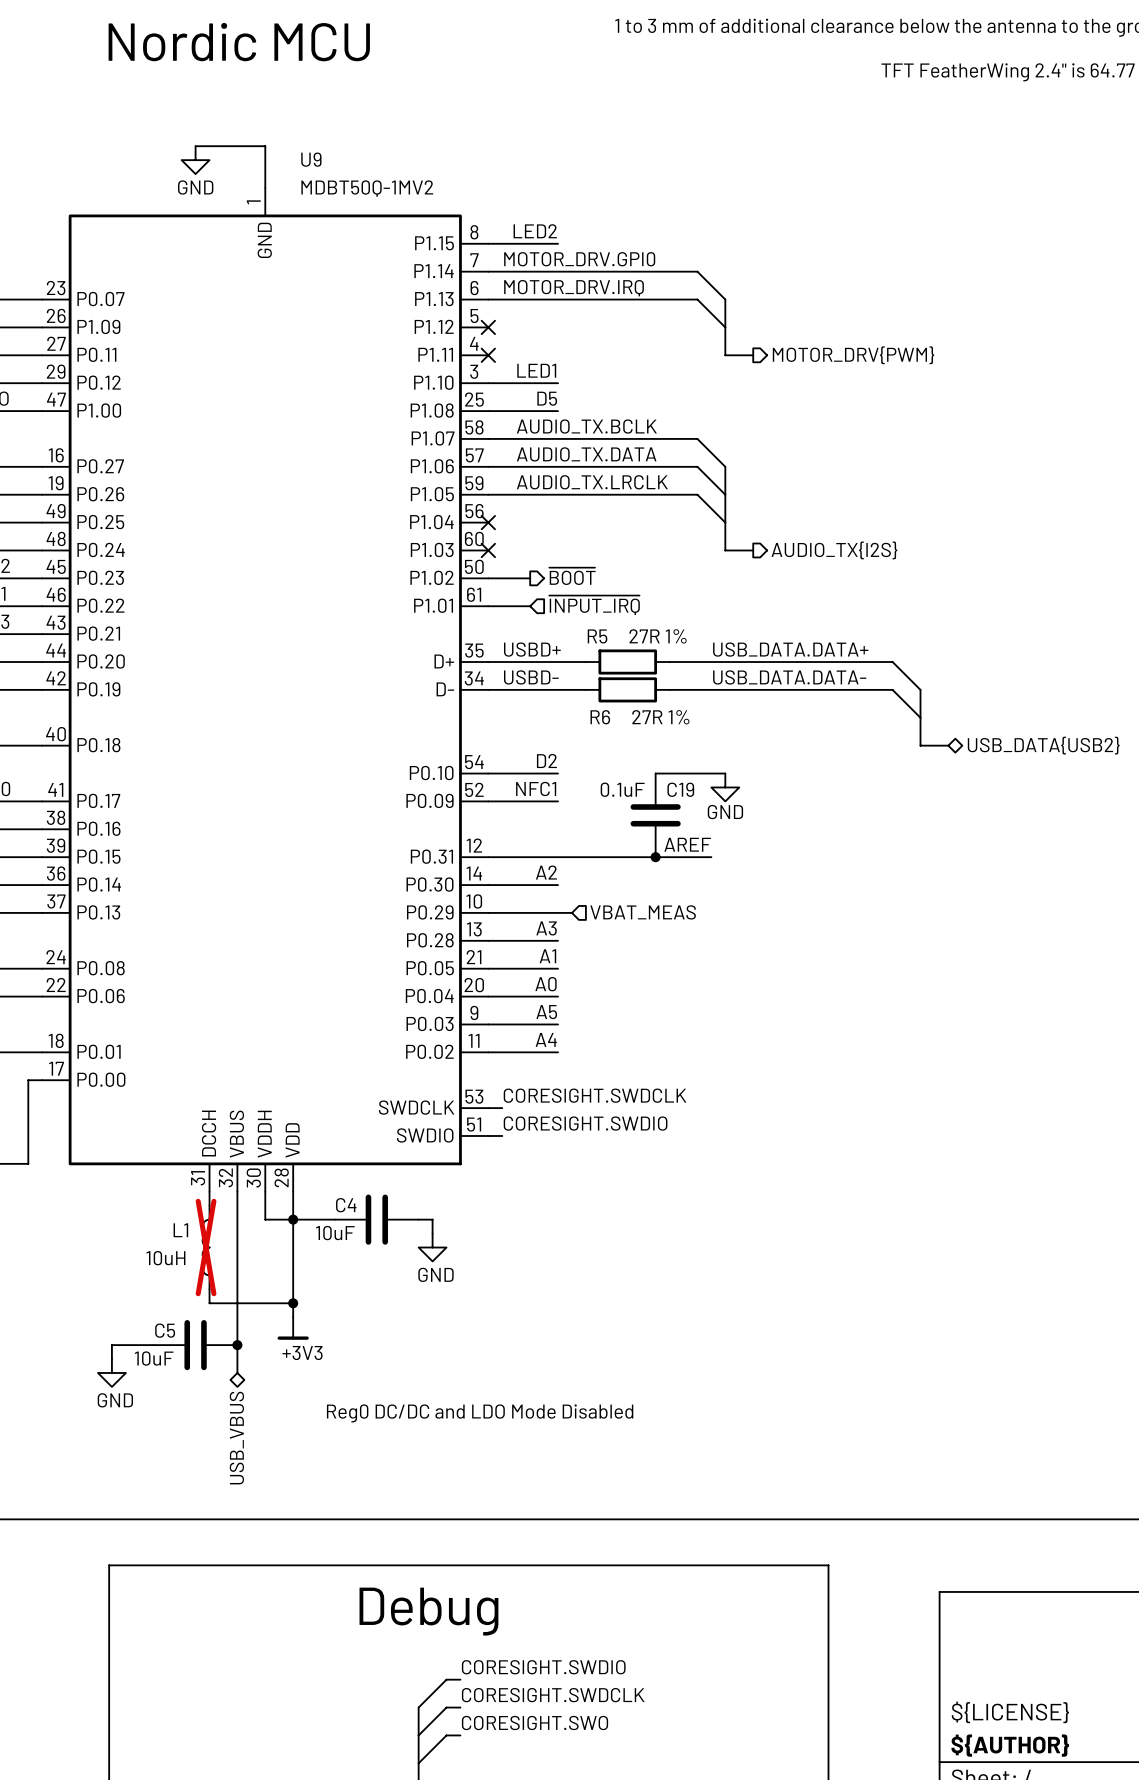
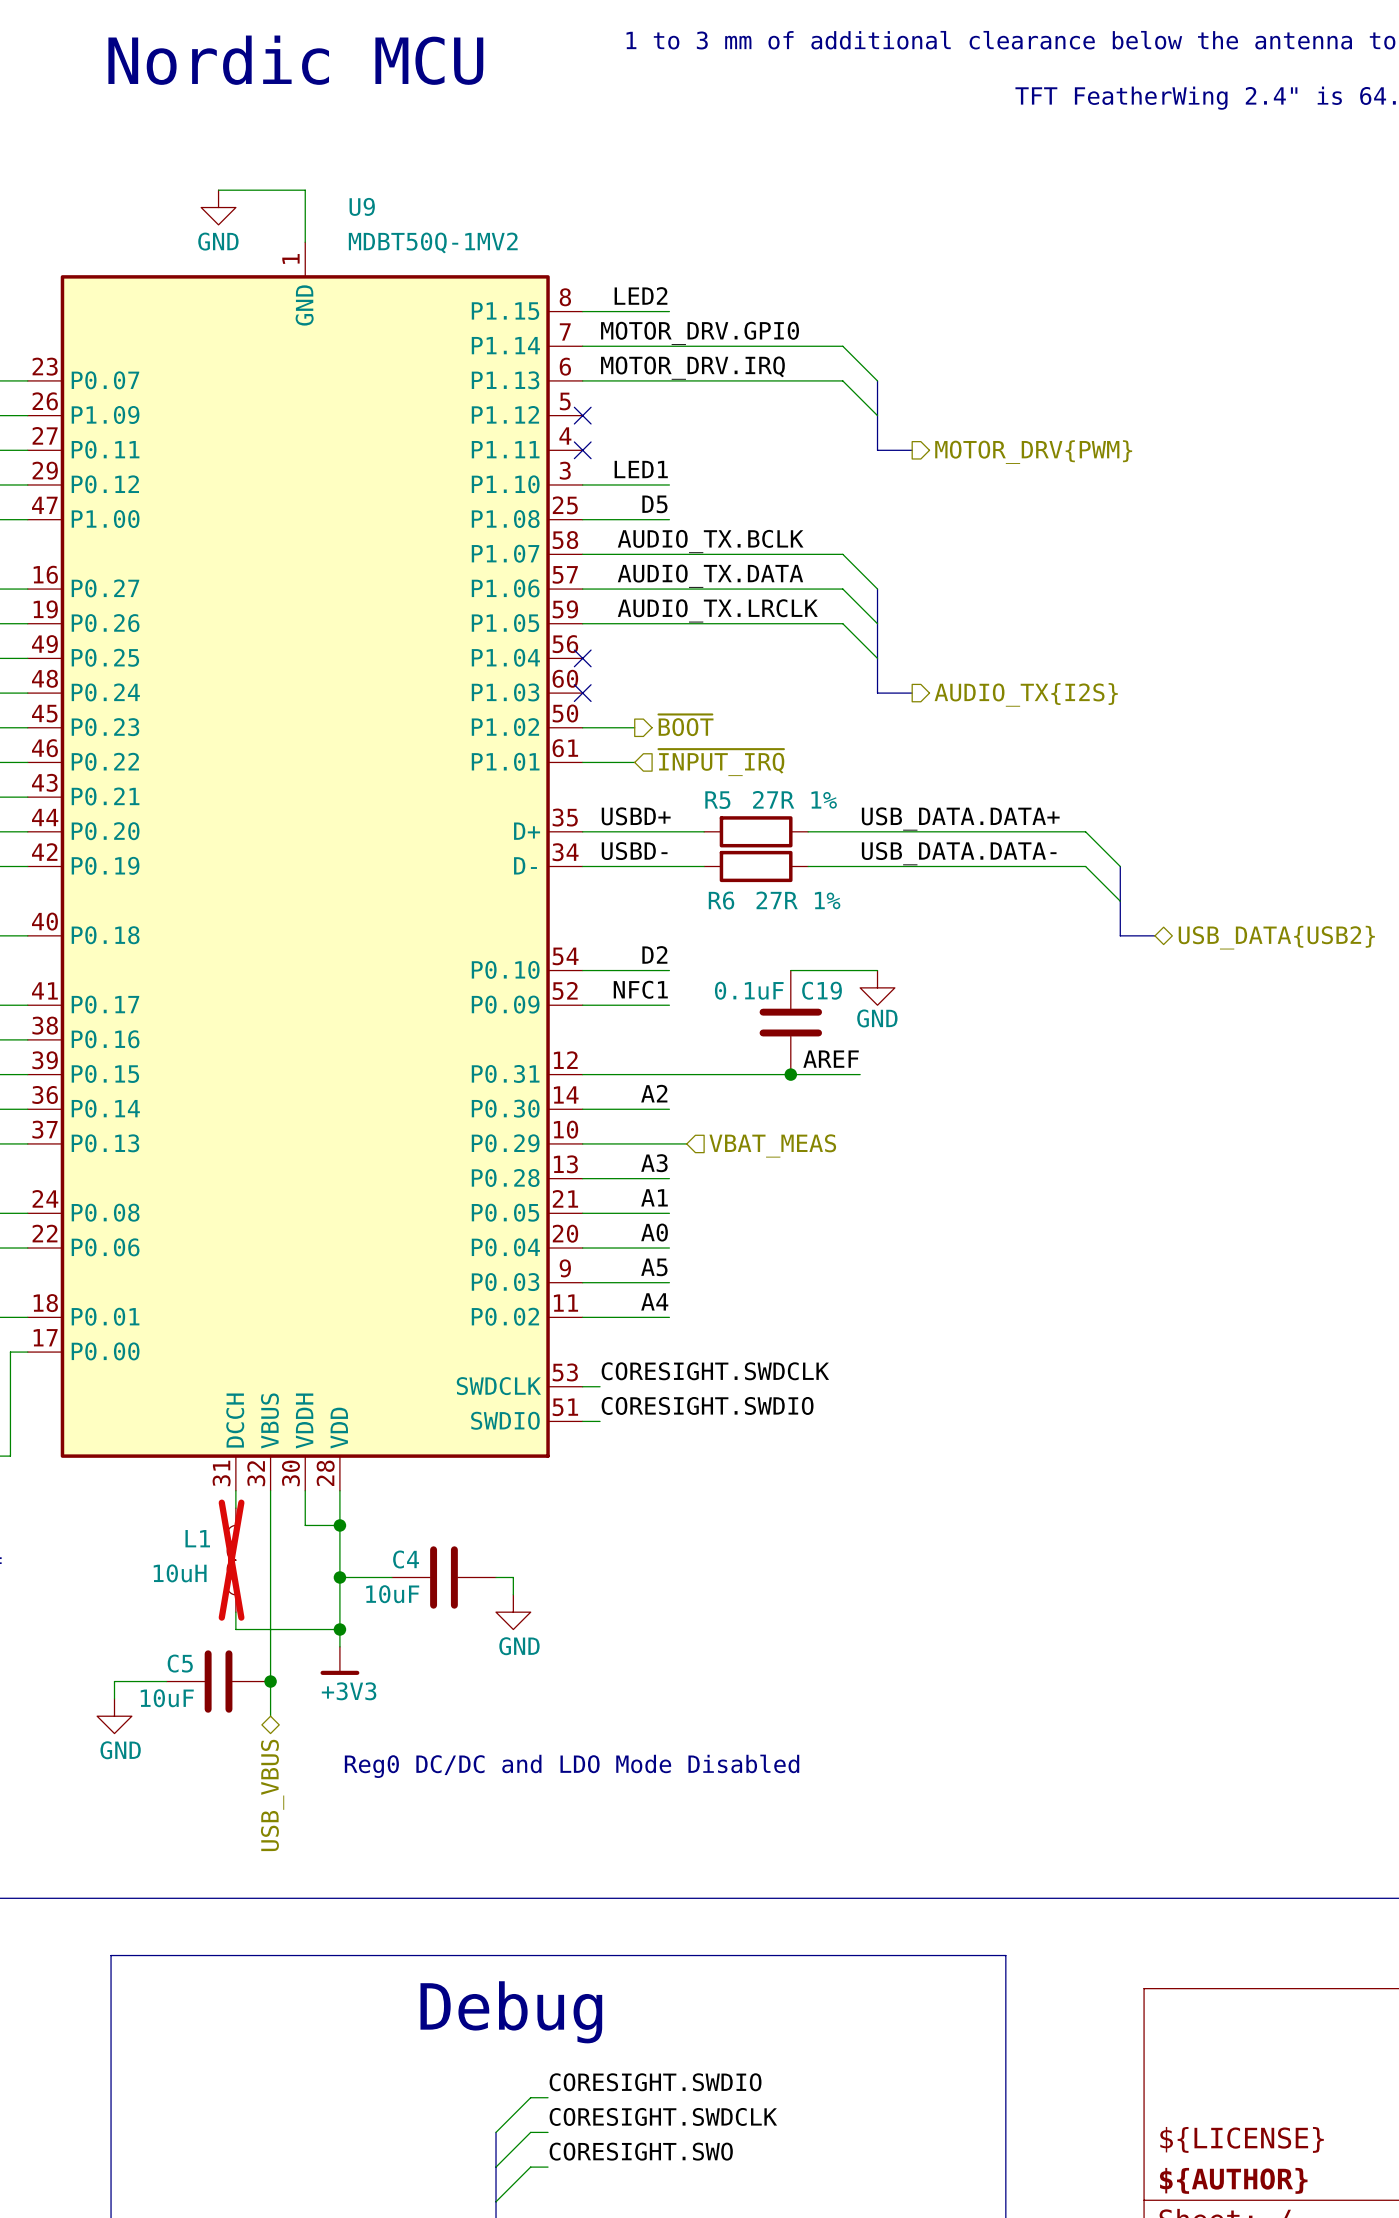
wire: (293, 1219) (334, 1219) -> (339, 1577) (391, 1577)
C4 position: (376, 1219) -> (443, 1577)
wire: (418, 1219) (432, 1219) (432, 1233) -> (496, 1577) (513, 1577) (513, 1594)
power symbol position: GND (432, 1247) -> GND (513, 1612)
junction: none -> (339, 1577)

